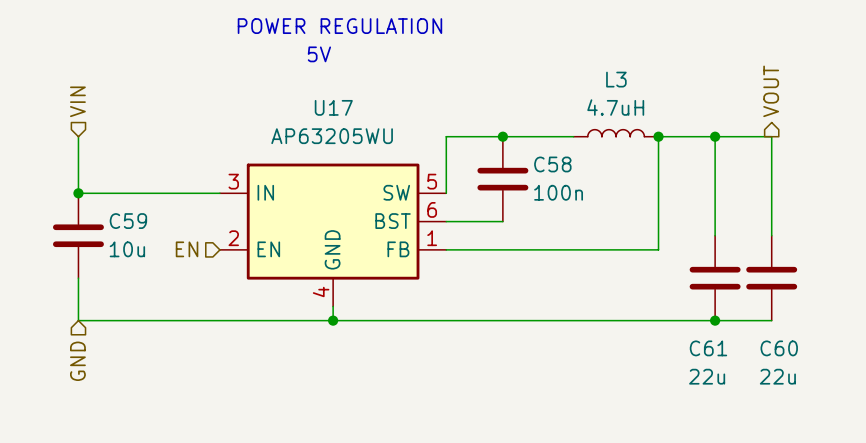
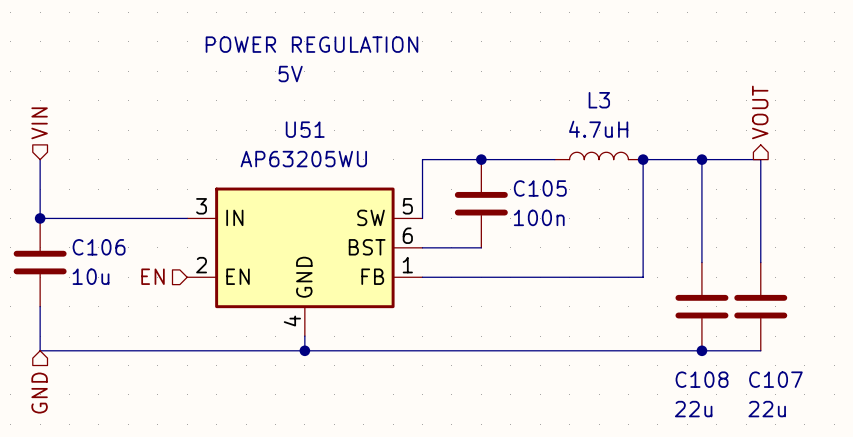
U17 name: U17 (333, 107) -> U51 (305, 129)
C58 name: C58 (552, 164) -> C105 (540, 188)
C59 name: C59 (128, 221) -> C106 (99, 247)
C61 name: C61 (708, 348) -> C108 (702, 379)
C60 name: C60 (779, 348) -> C107 (775, 379)

